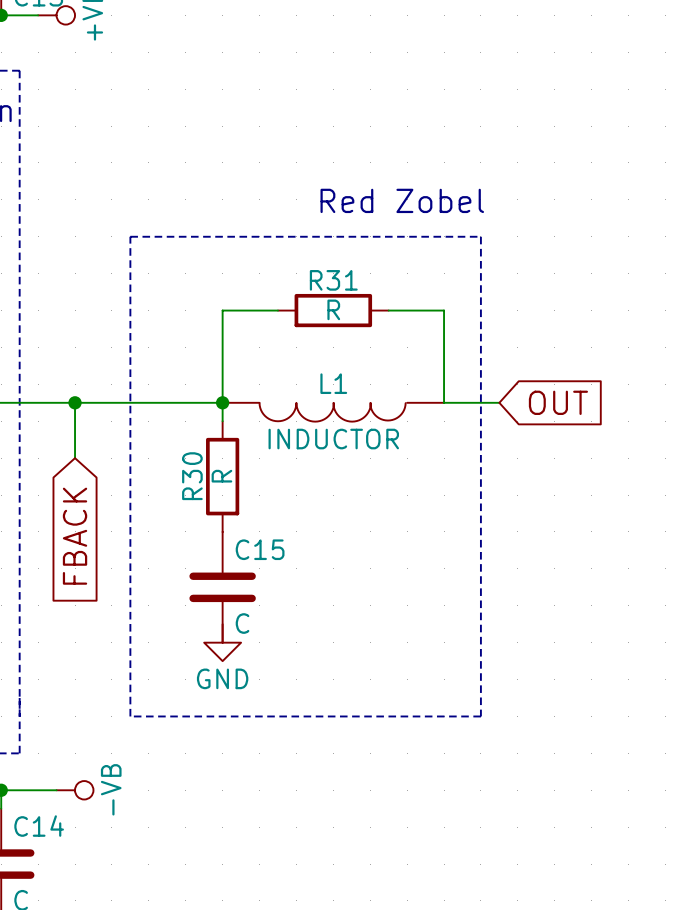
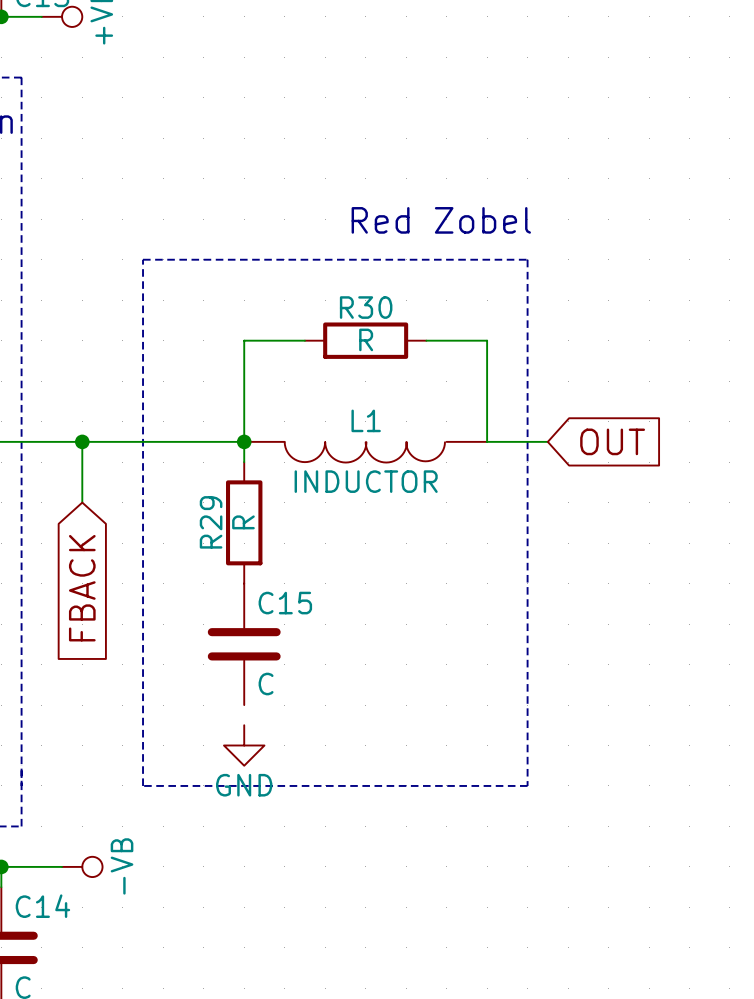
R31 name: R31 (333, 280) -> R30 (366, 307)
R30 name: R30 (192, 476) -> R29 (211, 522)
power symbol position: GND (222, 642) -> GND (244, 745)

